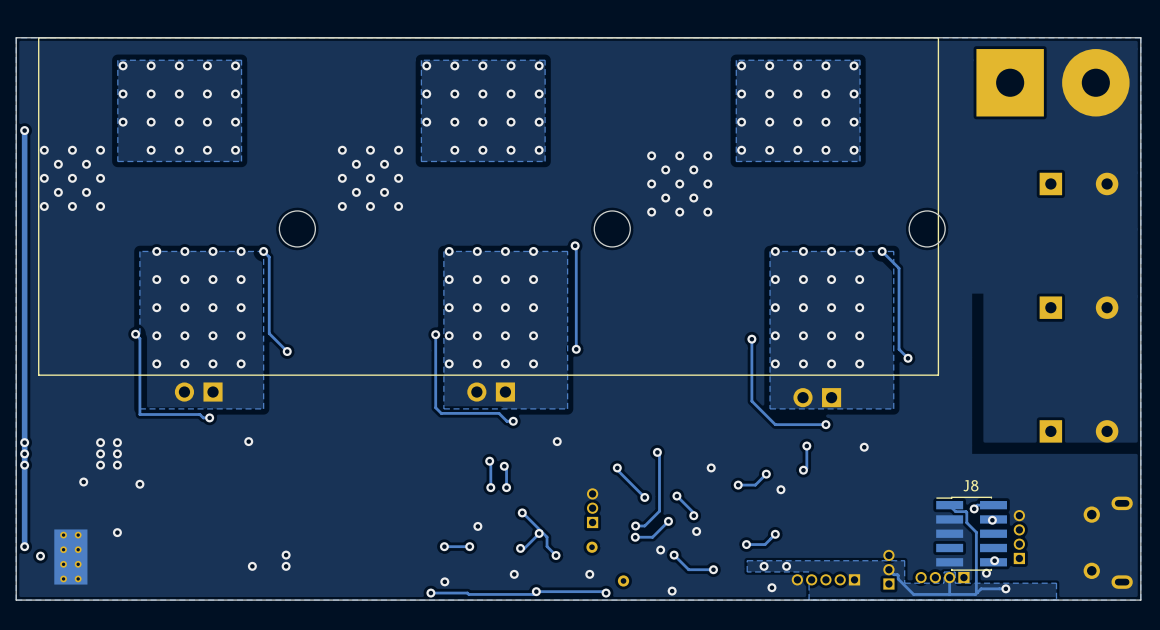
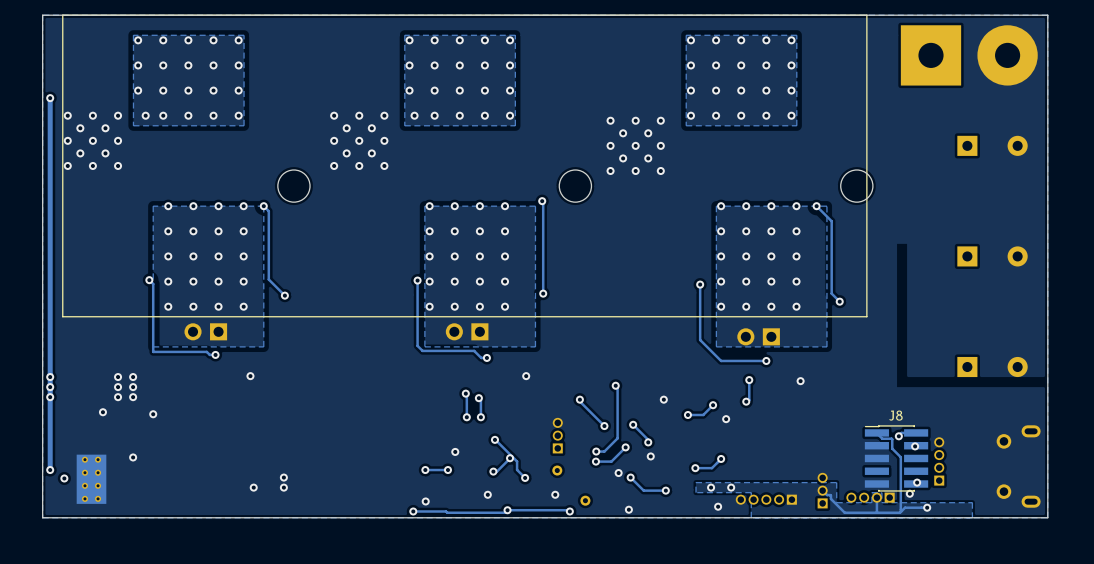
via: none -> (145, 115)
via: none -> (414, 115)

